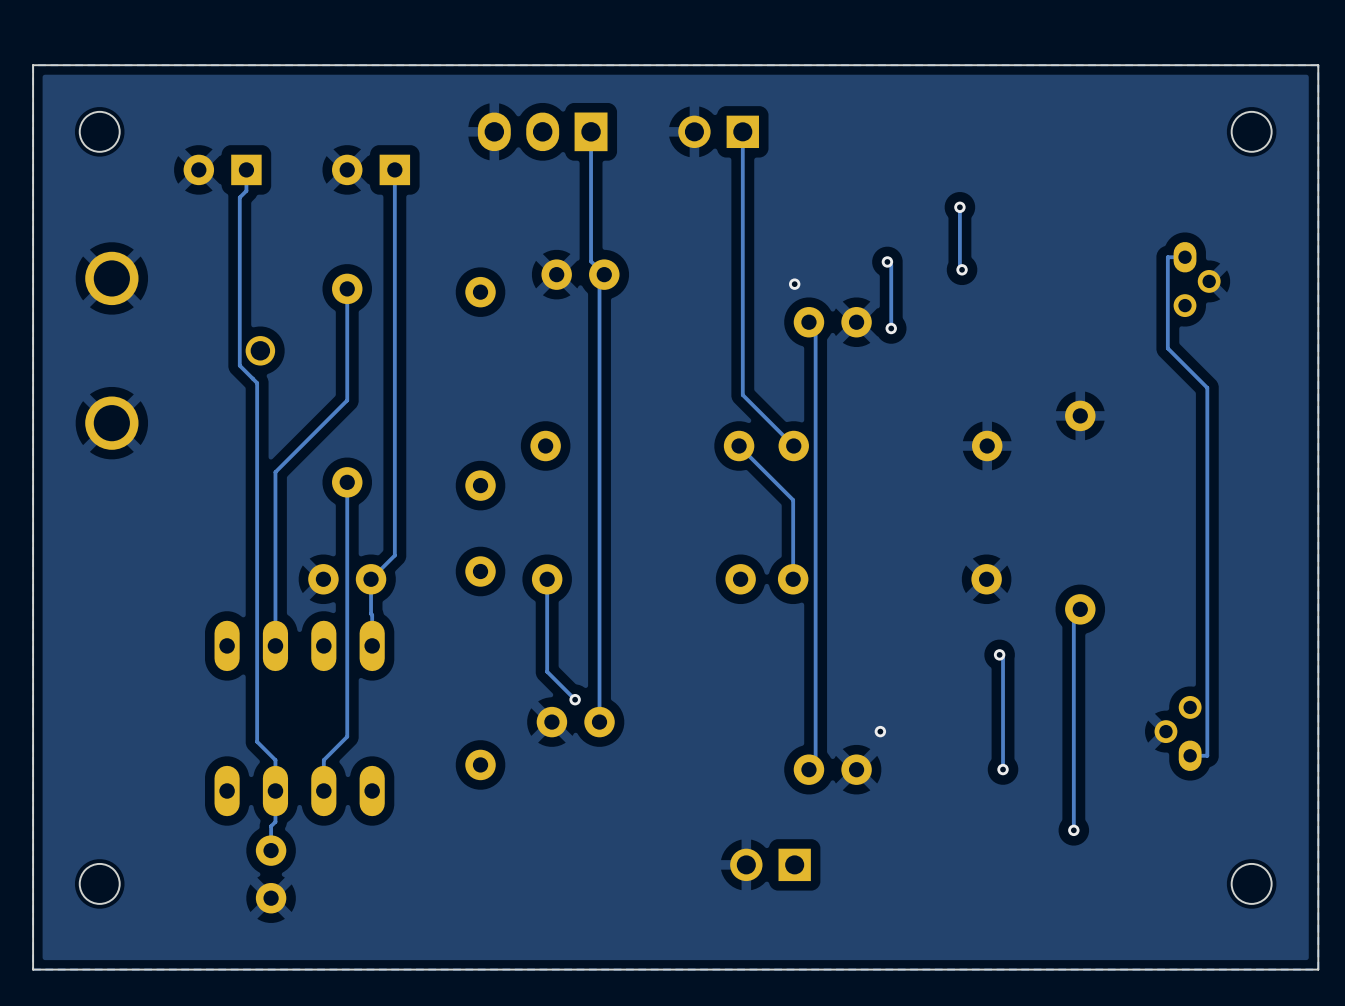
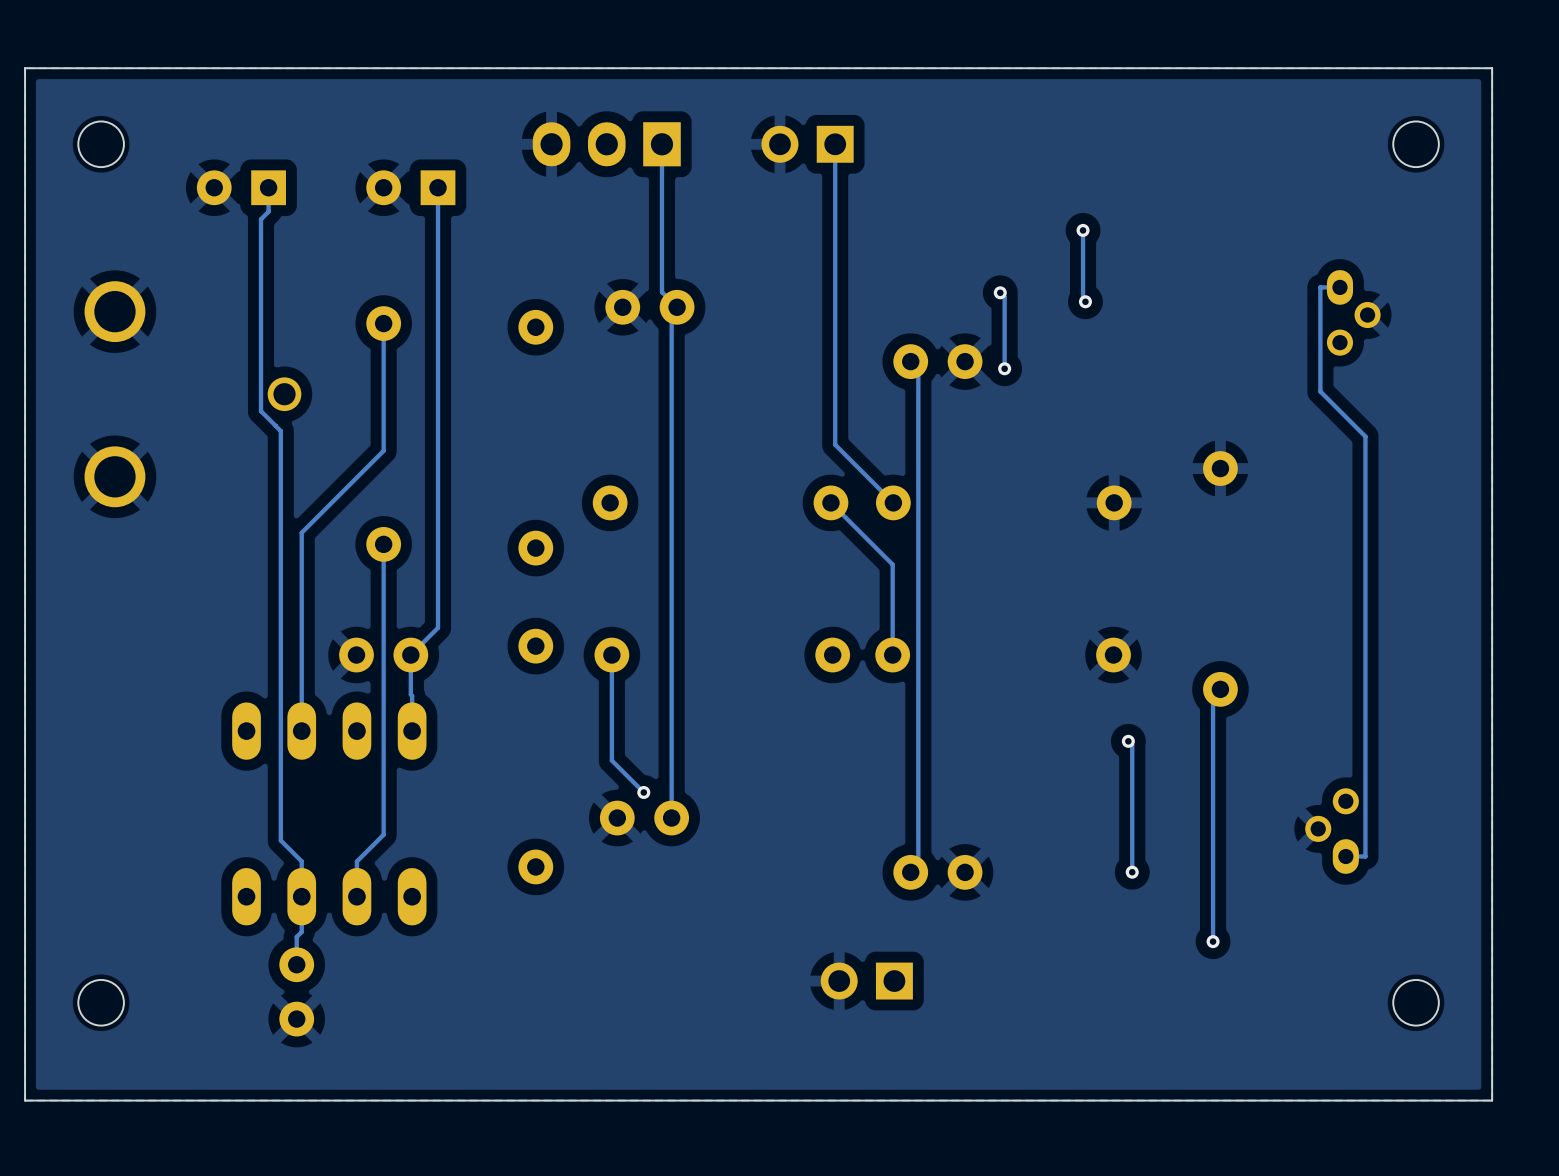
via: (794, 284) -> none
via: (880, 731) -> none

